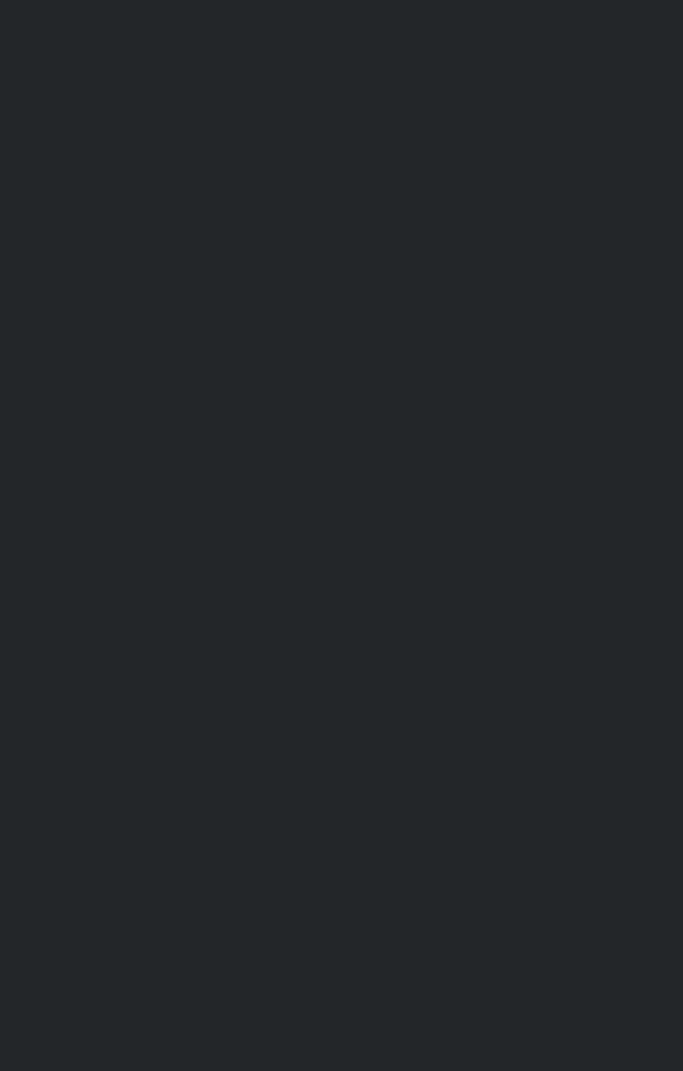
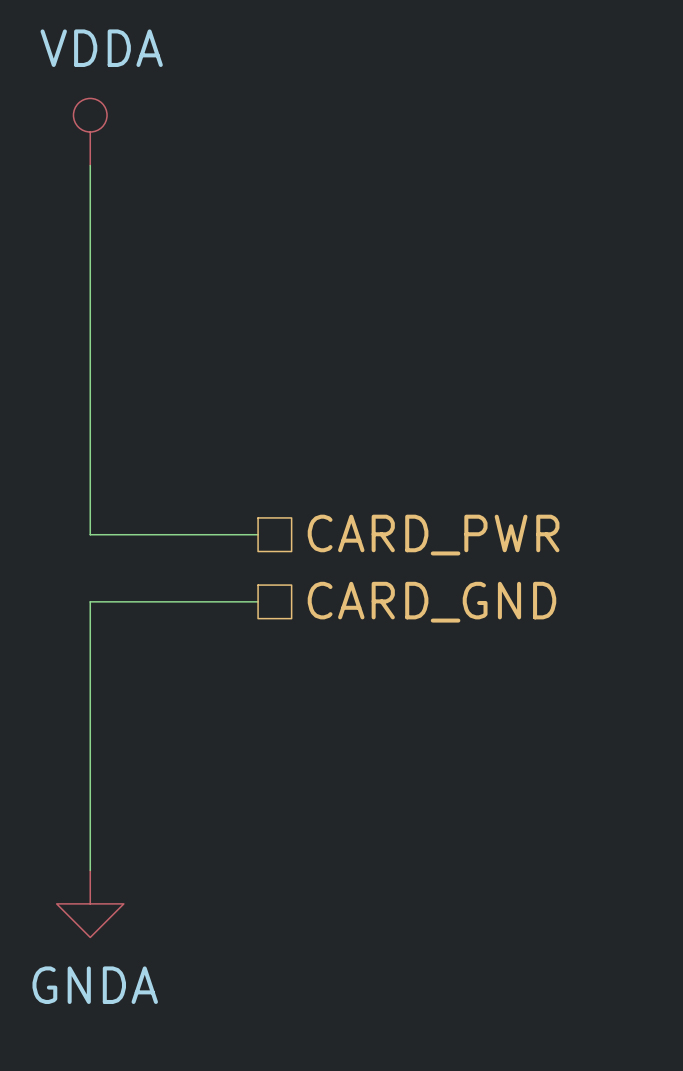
power symbol: none -> VDDA (90, 132)
wire: none -> (90, 165) (90, 534) (258, 534)
hierarchical label: none -> CARD_PWR (433, 535)
wire: none -> (258, 601) (90, 601) (90, 870)
hierarchical label: none -> CARD_GND (431, 602)
power symbol: none -> GNDA (90, 903)

